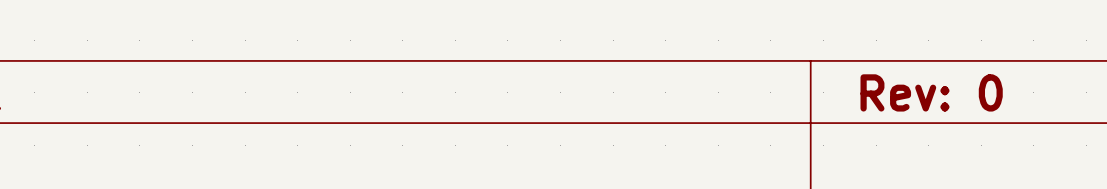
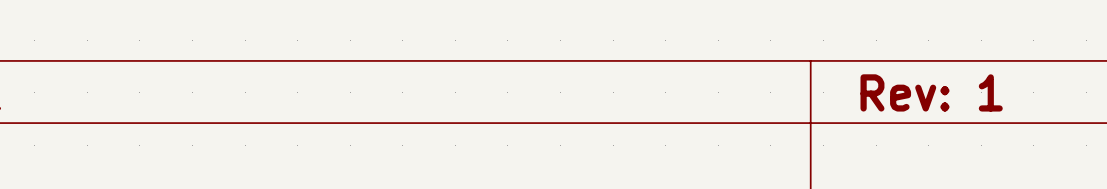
title block: Rev: 0 (931, 92) -> Rev: 1 (931, 92)

